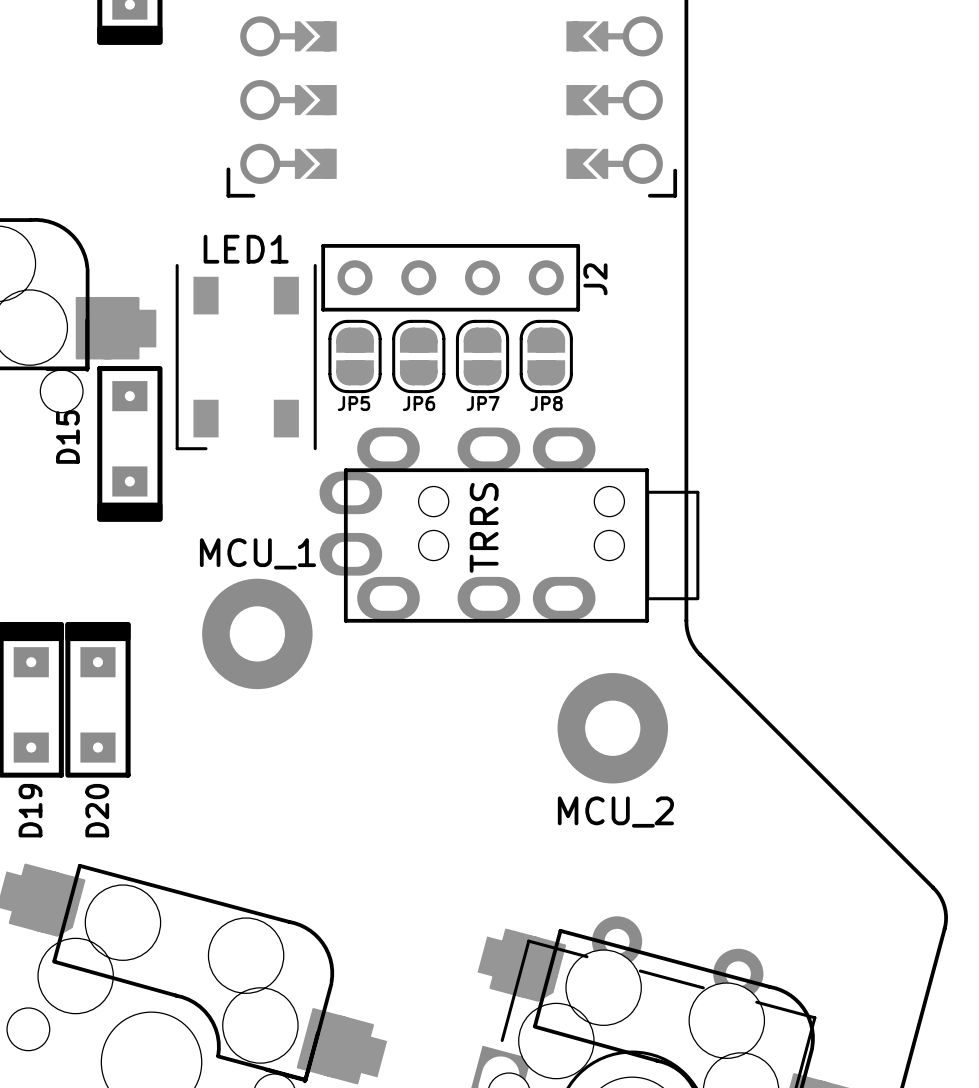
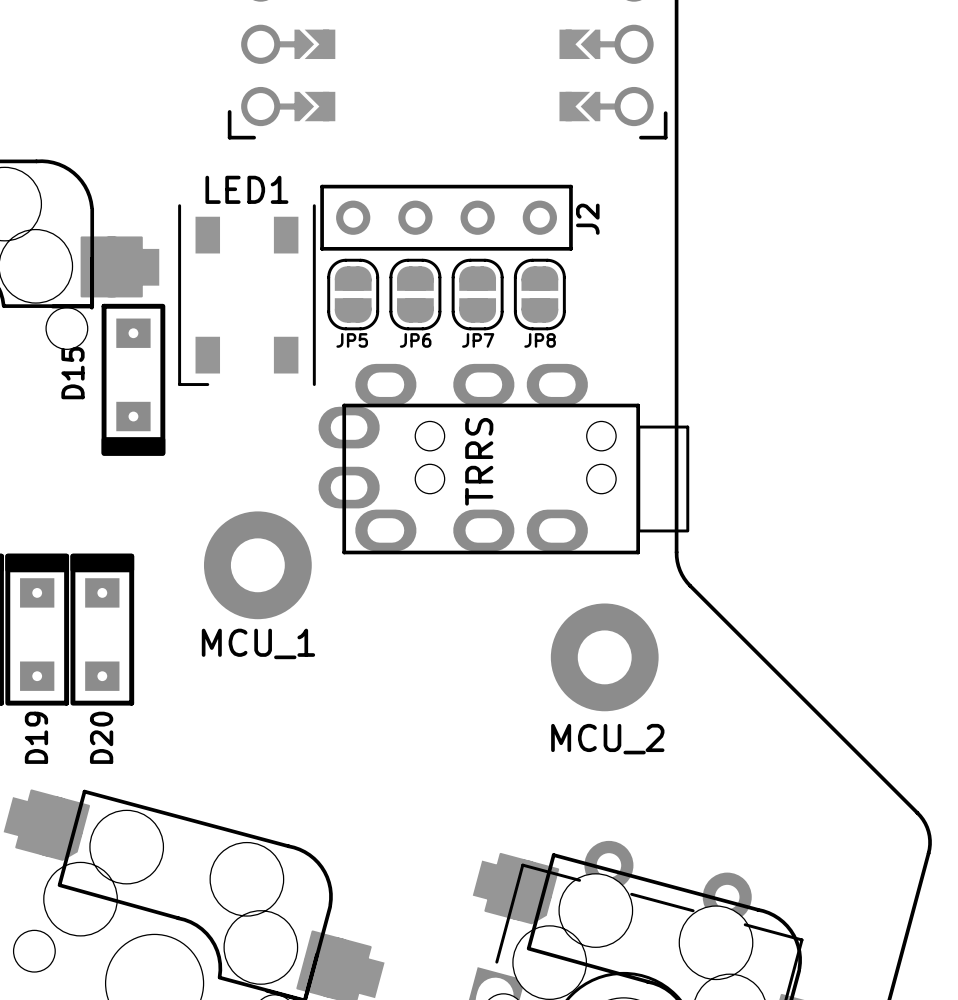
MCU_1 name position: MCU_1 (257, 553) -> MCU_1 (258, 643)

